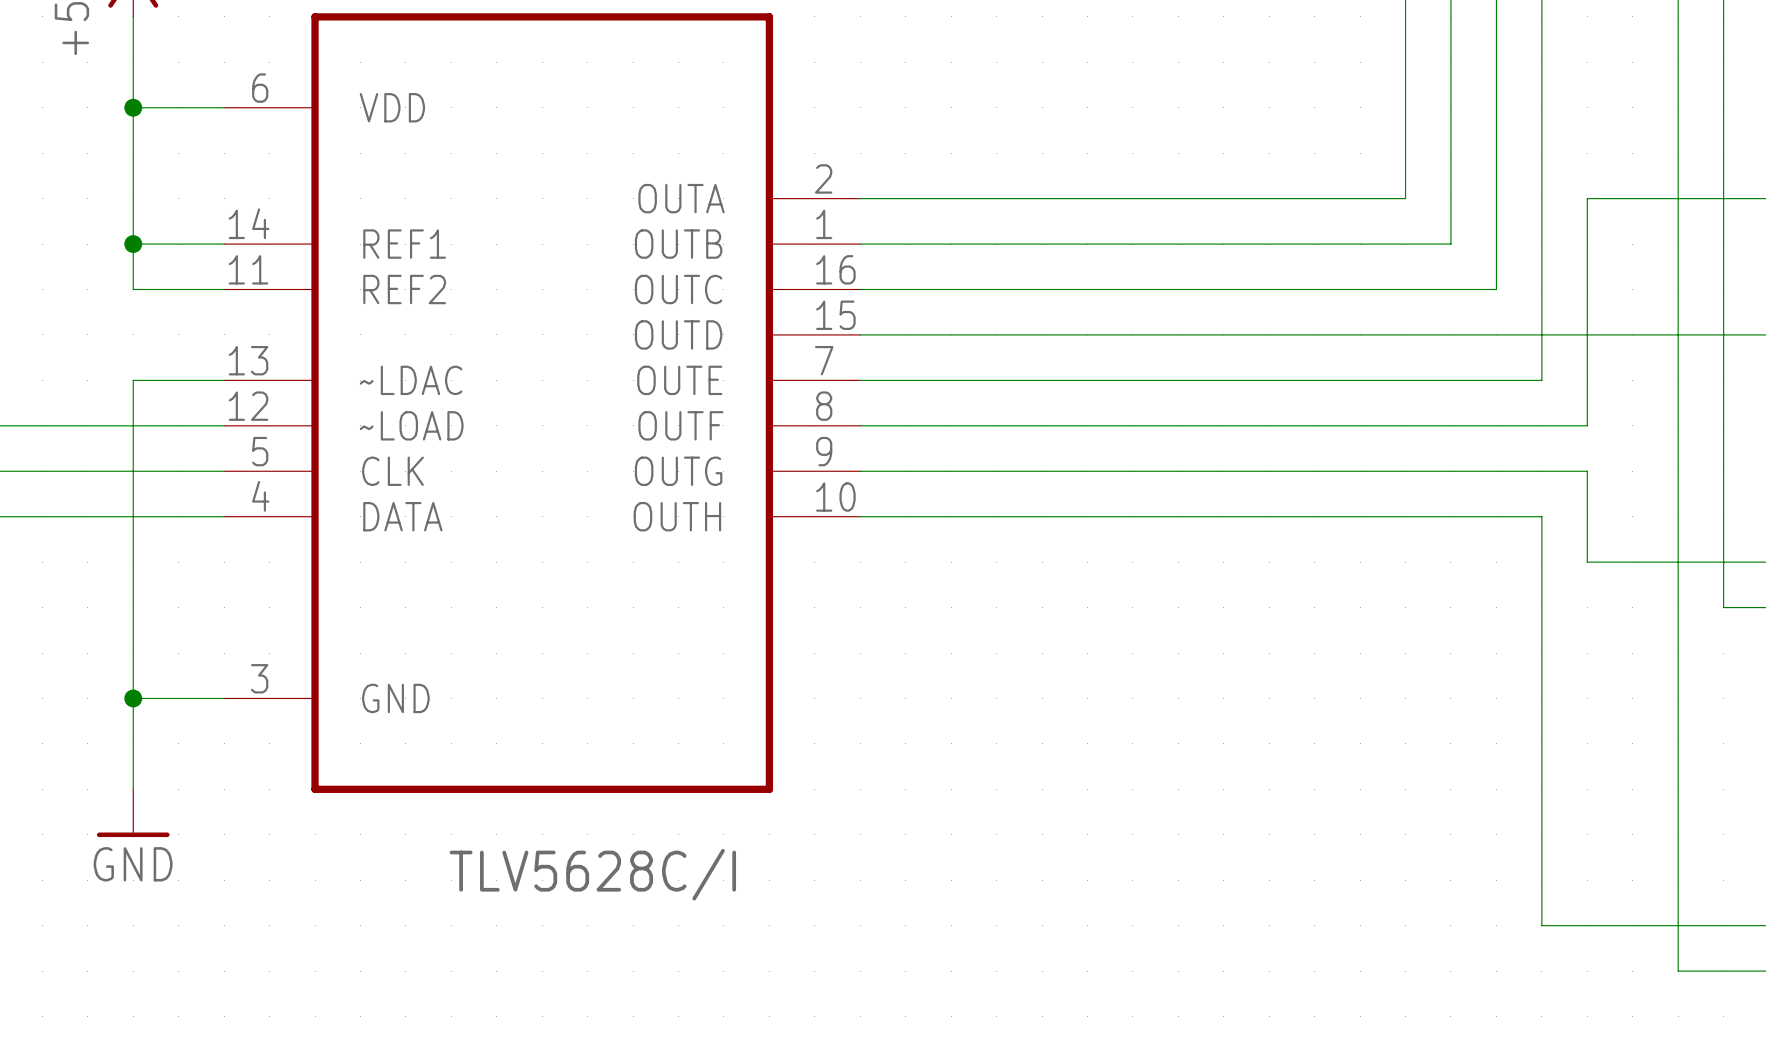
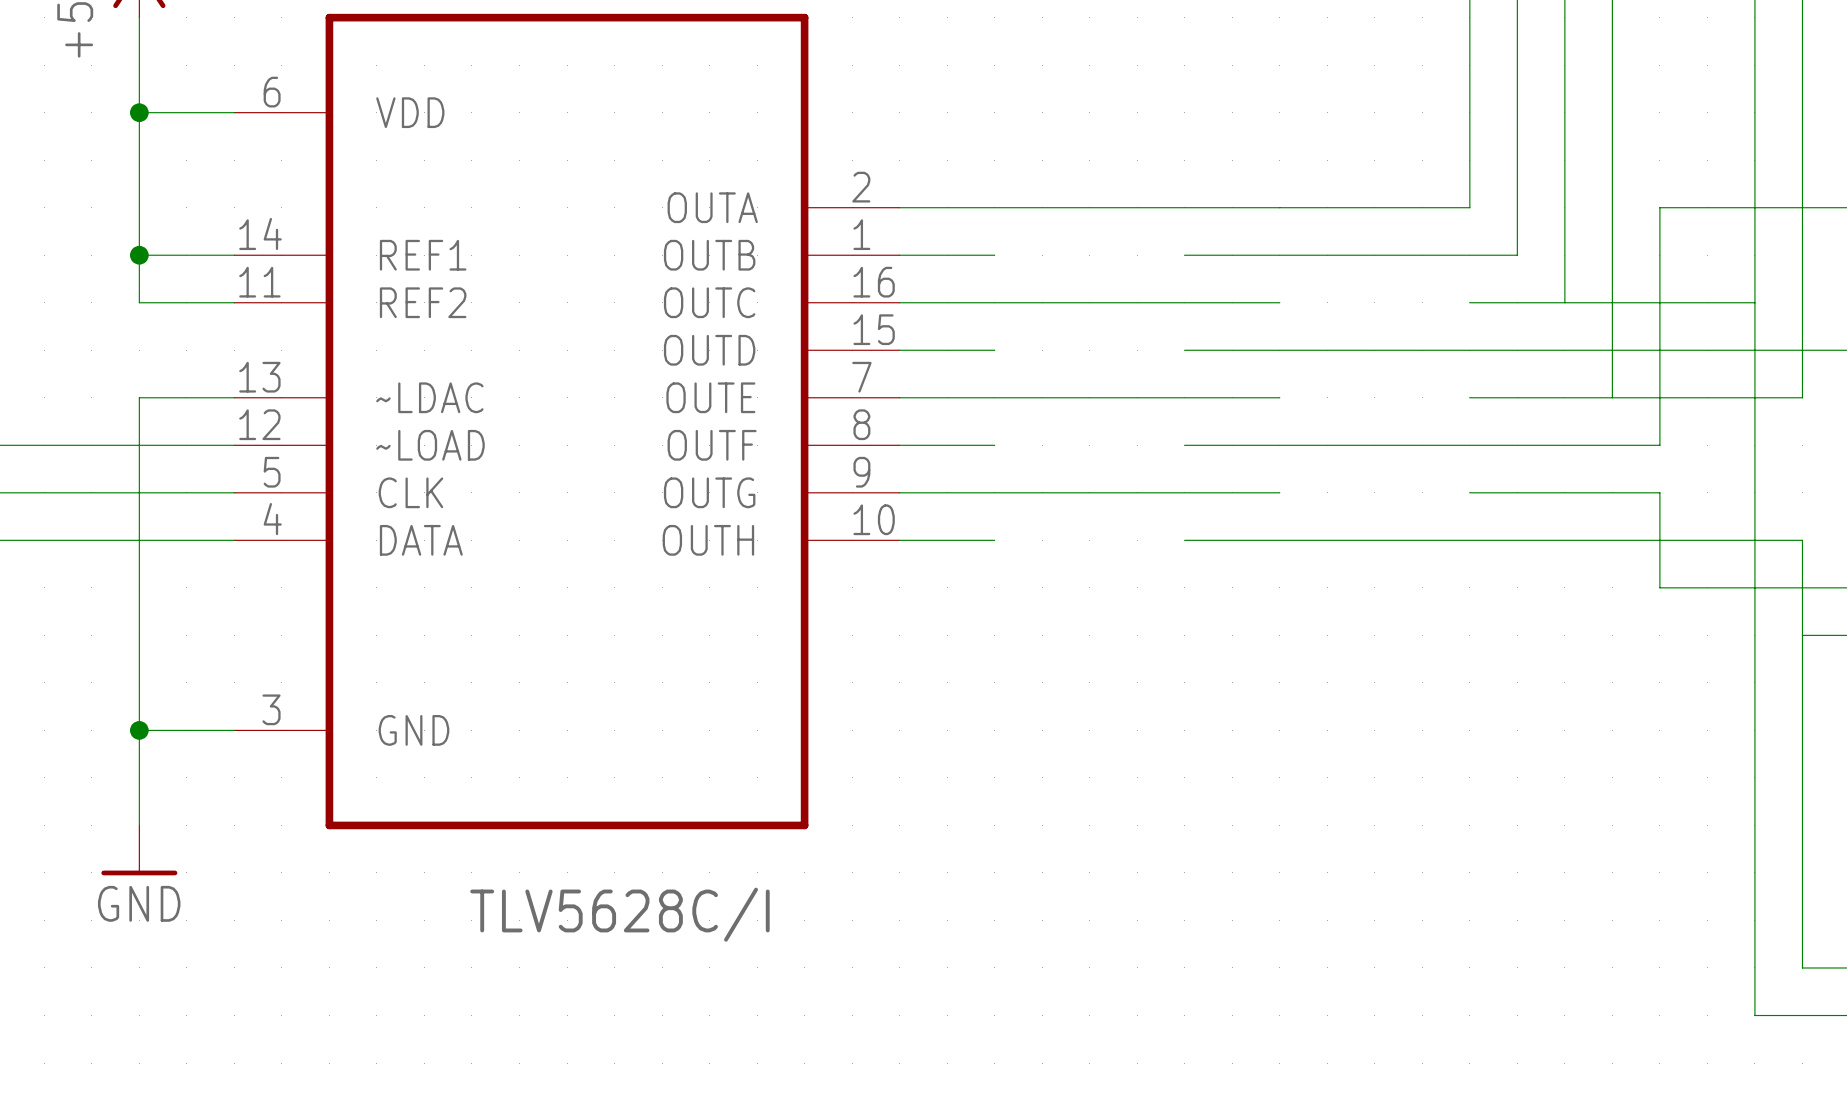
wire: (951, 244) (1132, 244) -> none
wire: (1223, 289) (1405, 289) -> (1564, 302) (1754, 302)
wire: (951, 334) (1132, 334) -> none
wire: (1223, 380) (1405, 380) -> none
wire: (1723, 380) (1723, 516) -> (1802, 397) (1612, 397)
wire: (951, 425) (1132, 425) -> none
wire: (1223, 471) (1405, 471) -> (1612, 540) (1802, 540)
wire: (951, 516) (1132, 516) -> none
wire: (1541, 516) (1541, 925) (1723, 925) -> (1802, 635) (1802, 967)

